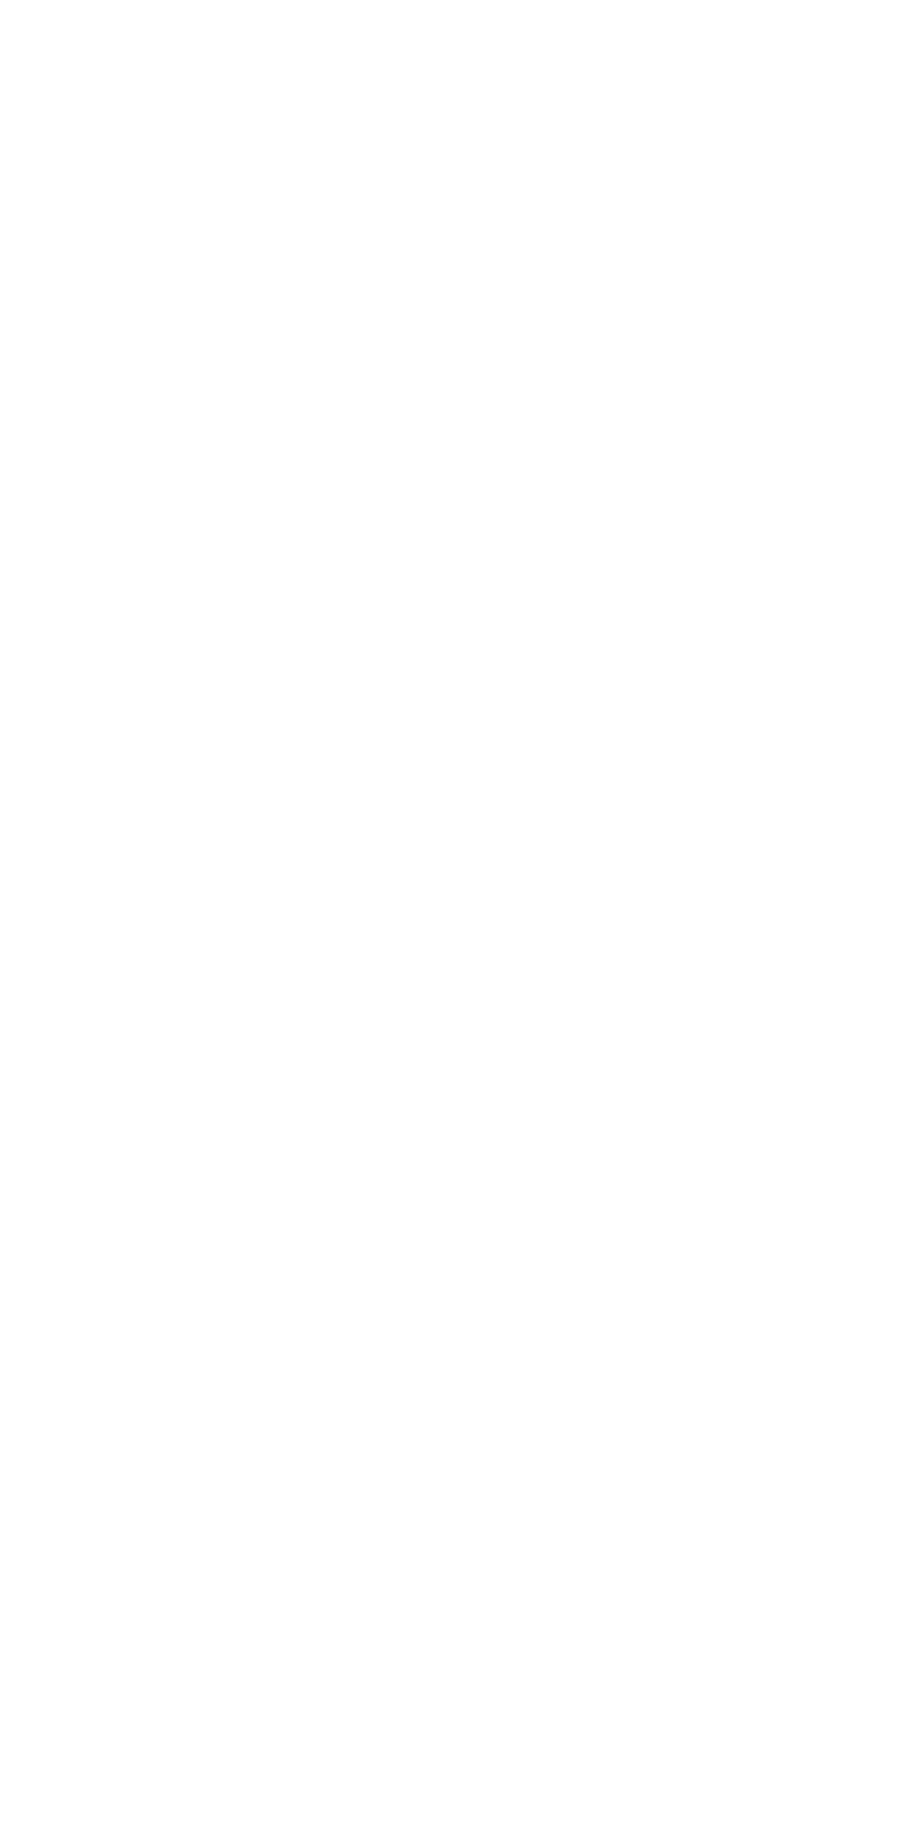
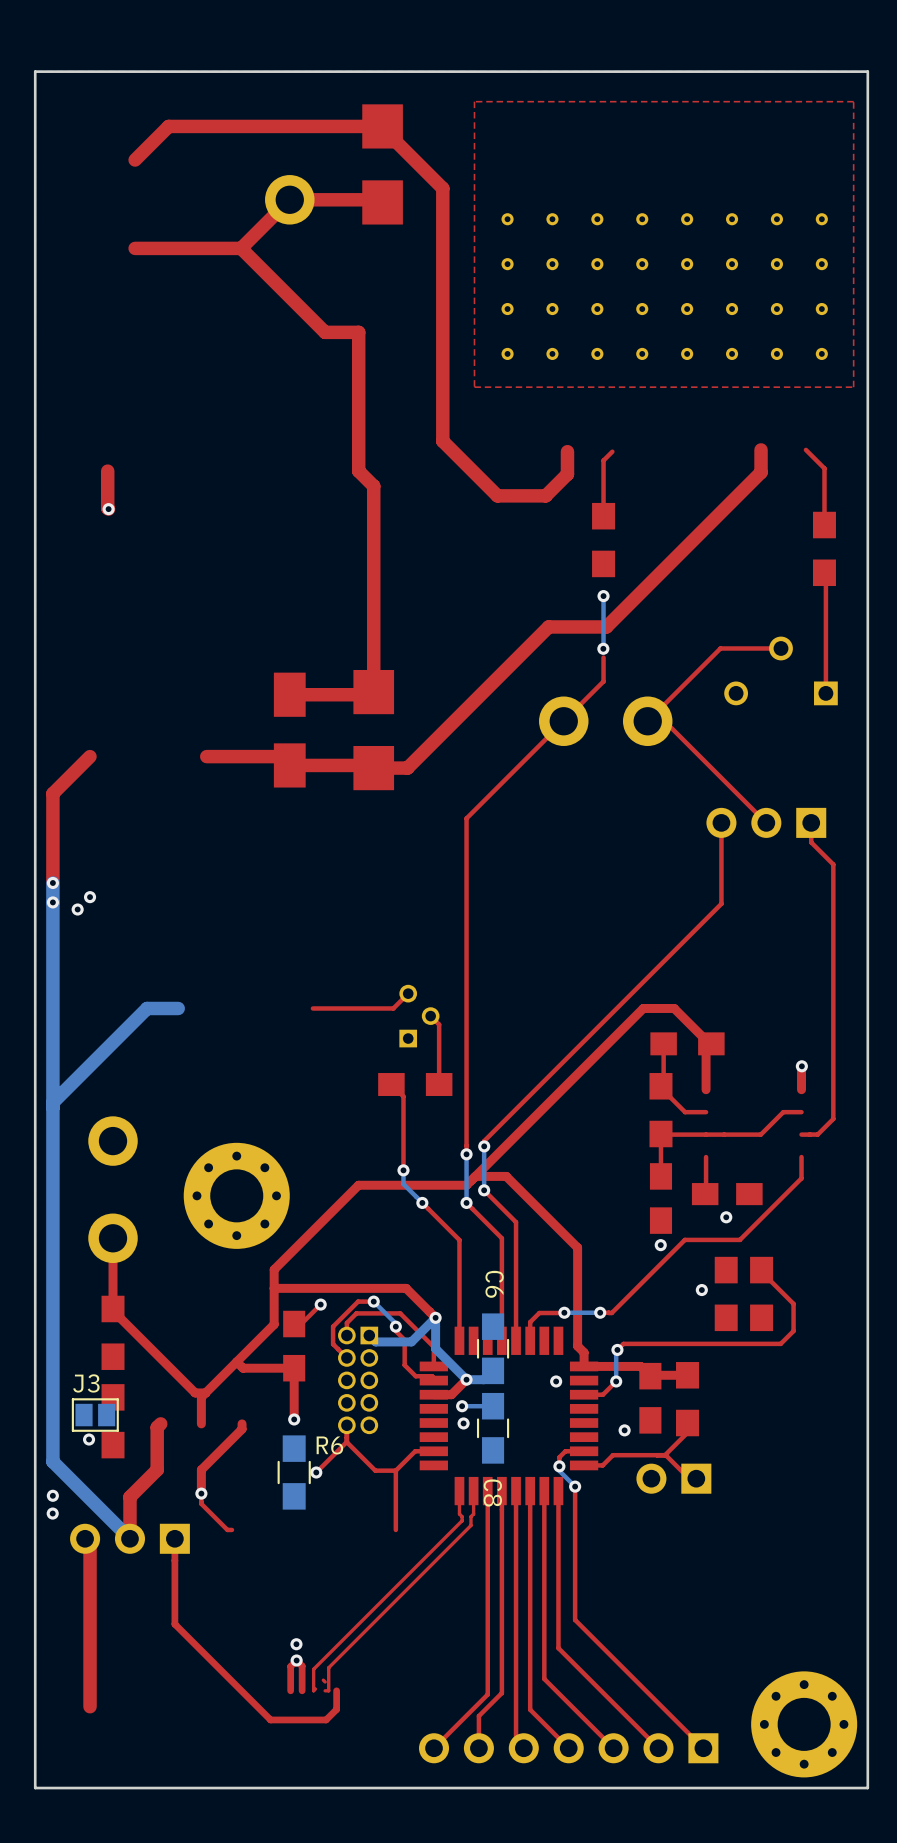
board edge: none -> (867, 71) (867, 1788) (35, 1788) (35, 71) (867, 71)
top zone outline: none -> (853, 101) (474, 101) (474, 387) (853, 387) (853, 101)
top track: none -> (135, 160) (168, 126) (382, 126) (442, 188) (442, 441) (497, 495) (545, 495) (567, 474) (567, 451)
part: none -> (382, 164)
part: none -> (289, 199)
top track: none -> (382, 202) (379, 199) (289, 199) (241, 248)
part: none -> (507, 219)
part: none -> (552, 219)
part: none -> (597, 219)
part: none -> (642, 219)
part: none -> (687, 219)
part: none -> (732, 219)
part: none -> (776, 219)
part: none -> (821, 219)
top track: none -> (241, 248) (325, 332) (358, 332) (358, 471) (373, 486) (373, 692) (371, 694) (289, 694)
top track: none -> (241, 248) (135, 248)
part: none -> (507, 264)
part: none -> (552, 264)
part: none -> (597, 264)
part: none -> (642, 264)
part: none -> (687, 264)
part: none -> (732, 264)
part: none -> (776, 264)
part: none -> (821, 264)
part: none -> (507, 309)
part: none -> (552, 309)
part: none -> (597, 309)
part: none -> (642, 309)
part: none -> (687, 309)
part: none -> (732, 309)
part: none -> (776, 309)
part: none -> (821, 309)
part: none -> (507, 353)
part: none -> (552, 353)
part: none -> (597, 353)
part: none -> (642, 353)
part: none -> (687, 353)
part: none -> (732, 353)
part: none -> (776, 353)
part: none -> (821, 353)
top track: none -> (761, 449) (761, 472) (606, 626) (548, 626) (407, 768) (373, 768) (371, 765) (289, 765) (280, 756) (206, 756)
top track: none -> (805, 449) (824, 468) (824, 525)
top track: none -> (612, 451) (603, 460) (603, 516)
top track: none -> (107, 471) (108, 509)
via: none -> (108, 509)
part: none -> (603, 540)
part: none -> (824, 548)
top track: none -> (824, 572) (825, 693)
bottom track: none -> (603, 596) (603, 648)
via: none -> (603, 596)
via: none -> (603, 648)
top track: none -> (781, 648) (720, 648) (647, 721) (664, 721) (766, 822)
top track: none -> (603, 657) (603, 681) (466, 818) (466, 1154)
part: none -> (781, 670)
part: none -> (563, 721)
part: none -> (647, 721)
part: none -> (289, 730)
part: none -> (373, 730)
top track: none -> (90, 756) (52, 793) (52, 882)
top track: none -> (721, 822) (721, 903) (484, 1141) (484, 1146)
part: none -> (766, 822)
top track: none -> (811, 822) (811, 842) (833, 864) (833, 1118) (817, 1134) (801, 1134)
bottom track: none -> (52, 882) (52, 1461) (129, 1538)
via: none -> (52, 882)
via: none -> (90, 897)
via: none -> (52, 902)
via: none -> (77, 909)
top track: none -> (408, 993) (393, 1008) (312, 1008)
bottom track: none -> (178, 1008) (147, 1008) (52, 1102)
part: none -> (419, 1016)
top track: none -> (430, 1016) (439, 1024) (439, 1084)
top track: none -> (663, 1043) (663, 1083) (660, 1088) (685, 1112) (706, 1112)
part: none -> (687, 1043)
top track: none -> (801, 1066) (801, 1089)
via: none -> (801, 1066)
top track: none -> (391, 1084) (403, 1096) (403, 1170)
part: none -> (415, 1084)
top track: none -> (706, 1089) (706, 1049) (711, 1043) (674, 1008) (643, 1008) (466, 1185) (358, 1185) (274, 1269) (274, 1324) (201, 1397) (201, 1423)
part: none -> (660, 1110)
top track: none -> (801, 1112) (783, 1112) (760, 1134) (660, 1133) (660, 1176)
part: none -> (113, 1141)
bottom track: none -> (484, 1146) (484, 1190)
via: none -> (484, 1146)
bottom track: none -> (466, 1154) (466, 1202)
via: none -> (466, 1154)
top track: none -> (706, 1157) (705, 1194)
top track: none -> (801, 1157) (801, 1178) (739, 1239) (684, 1239) (611, 1313) (600, 1312)
bottom track: none -> (403, 1170) (403, 1184) (422, 1202)
via: none -> (403, 1170)
top track: none -> (475, 1176) (506, 1176) (577, 1247) (577, 1346) (584, 1352) (584, 1366) (640, 1366) (650, 1376) (687, 1375)
top track: none -> (484, 1190) (516, 1222) (516, 1340)
via: none -> (484, 1190)
part: none -> (727, 1194)
part: none -> (236, 1195)
part: none -> (660, 1198)
top track: none -> (422, 1202) (459, 1240) (459, 1340)
via: none -> (422, 1202)
top track: none -> (466, 1202) (501, 1238) (501, 1340)
via: none -> (466, 1202)
via: none -> (726, 1217)
top track: none -> (113, 1238) (113, 1310) (195, 1392) (205, 1392)
part: none -> (113, 1238)
via: none -> (660, 1245)
top track: none -> (761, 1270) (793, 1303) (793, 1331) (780, 1343) (623, 1343) (617, 1349)
top track: none -> (274, 1288) (406, 1288) (435, 1317)
via: none -> (701, 1290)
part: none -> (726, 1293)
part: none -> (761, 1293)
bottom track: none -> (373, 1301) (395, 1323) (395, 1326)
top track: none -> (373, 1301) (358, 1301) (333, 1326) (333, 1344) (346, 1357)
via: none -> (373, 1301)
top track: none -> (320, 1304) (301, 1324) (294, 1324)
via: none -> (320, 1304)
top track: none -> (564, 1312) (539, 1313) (530, 1322) (530, 1340)
via: none -> (564, 1312)
bottom track: none -> (600, 1312) (564, 1312)
via: none -> (600, 1312)
via: none -> (435, 1317)
top track: none -> (395, 1326) (395, 1331) (404, 1339) (404, 1365) (415, 1376) (432, 1376) (433, 1380)
via: none -> (395, 1326)
part: none -> (113, 1332)
top track: none -> (346, 1335) (346, 1323) (356, 1313) (400, 1313) (433, 1347) (433, 1366)
bottom track: none -> (369, 1335) (375, 1341) (411, 1341) (435, 1317) (435, 1348) (466, 1379) (484, 1379) (493, 1370)
part: none -> (294, 1346)
C6: none -> (493, 1348)
bottom track: none -> (617, 1349) (616, 1381)
via: none -> (617, 1349)
top track: none -> (236, 1361) (243, 1368) (294, 1368) (294, 1419)
top track: none -> (466, 1379) (451, 1394) (433, 1394)
via: none -> (466, 1379)
part: none -> (358, 1380)
via: none -> (556, 1381)
top track: none -> (616, 1381) (602, 1394) (584, 1394)
via: none -> (616, 1381)
part: none -> (650, 1398)
part: none -> (687, 1399)
via: none -> (462, 1406)
bottom track: none -> (493, 1406) (462, 1406)
J3: none -> (95, 1415)
part: none -> (508, 1415)
via: none -> (294, 1419)
part: none -> (113, 1421)
top track: none -> (160, 1423) (157, 1427) (157, 1469) (129, 1497) (129, 1538)
top track: none -> (242, 1423) (242, 1429) (201, 1469) (201, 1503) (227, 1529) (231, 1529)
via: none -> (463, 1423)
top track: none -> (687, 1423) (687, 1432) (665, 1455)
top track: none -> (346, 1425) (346, 1442) (375, 1470) (395, 1470)
C8: none -> (493, 1428)
via: none -> (624, 1430)
via: none -> (89, 1439)
top track: none -> (346, 1441) (316, 1472)
top track: none -> (433, 1451) (415, 1451) (395, 1470)
top track: none -> (584, 1451) (565, 1451) (559, 1457) (559, 1466)
top track: none -> (584, 1465) (602, 1465) (612, 1455) (665, 1455) (689, 1478) (696, 1478)
bottom track: none -> (559, 1466) (559, 1470) (575, 1486)
via: none -> (559, 1466)
top track: none -> (395, 1470) (395, 1529)
R6: none -> (294, 1472)
via: none -> (316, 1472)
part: none -> (673, 1478)
top track: none -> (575, 1486) (575, 1619) (703, 1748)
via: none -> (575, 1486)
top track: none -> (459, 1491) (459, 1514) (462, 1520) (313, 1669) (313, 1690) (315, 1689)
top track: none -> (473, 1491) (473, 1514) (470, 1516) (470, 1525) (328, 1667) (328, 1690) (325, 1690)
top track: none -> (487, 1491) (487, 1694) (434, 1748)
top track: none -> (501, 1491) (501, 1693) (478, 1716) (478, 1748)
top track: none -> (516, 1491) (516, 1740) (523, 1748)
top track: none -> (530, 1491) (530, 1709) (568, 1748)
top track: none -> (544, 1491) (544, 1678) (613, 1748)
top track: none -> (558, 1491) (558, 1648) (658, 1748)
via: none -> (201, 1493)
via: none -> (52, 1495)
via: none -> (52, 1513)
top track: none -> (85, 1538) (90, 1543) (90, 1706)
part: none -> (129, 1538)
top track: none -> (174, 1538) (174, 1624) (270, 1719) (326, 1719) (336, 1709) (336, 1690)
via: none -> (296, 1644)
via: none -> (296, 1660)
top track: none -> (323, 1680) (325, 1681)
top track: none -> (302, 1690) (302, 1666) (296, 1660) (290, 1666) (290, 1690)
part: none -> (804, 1724)
part: none -> (568, 1748)

